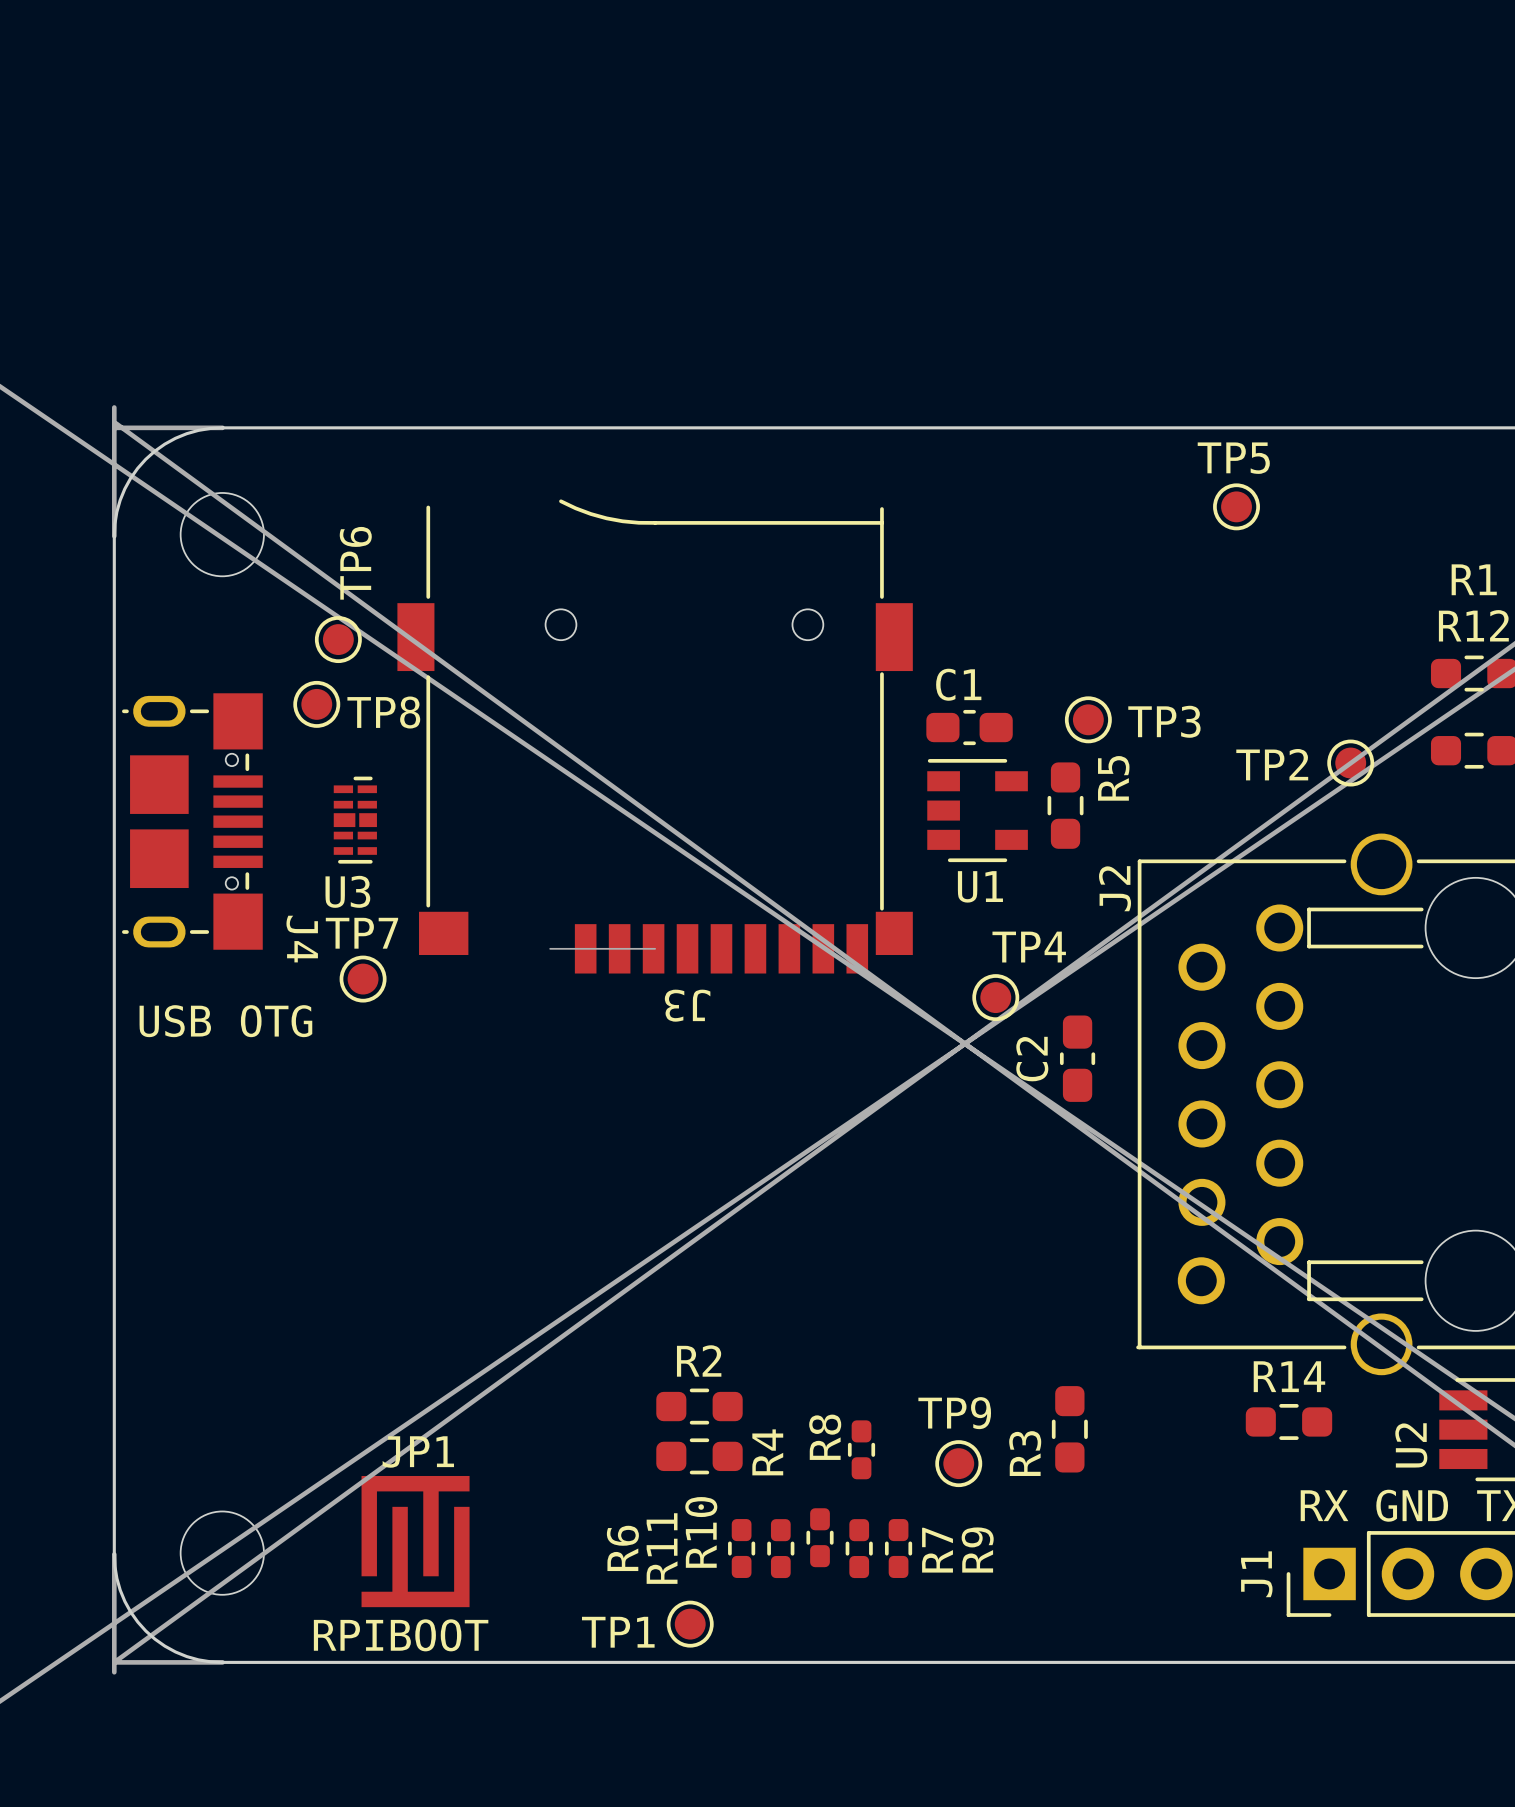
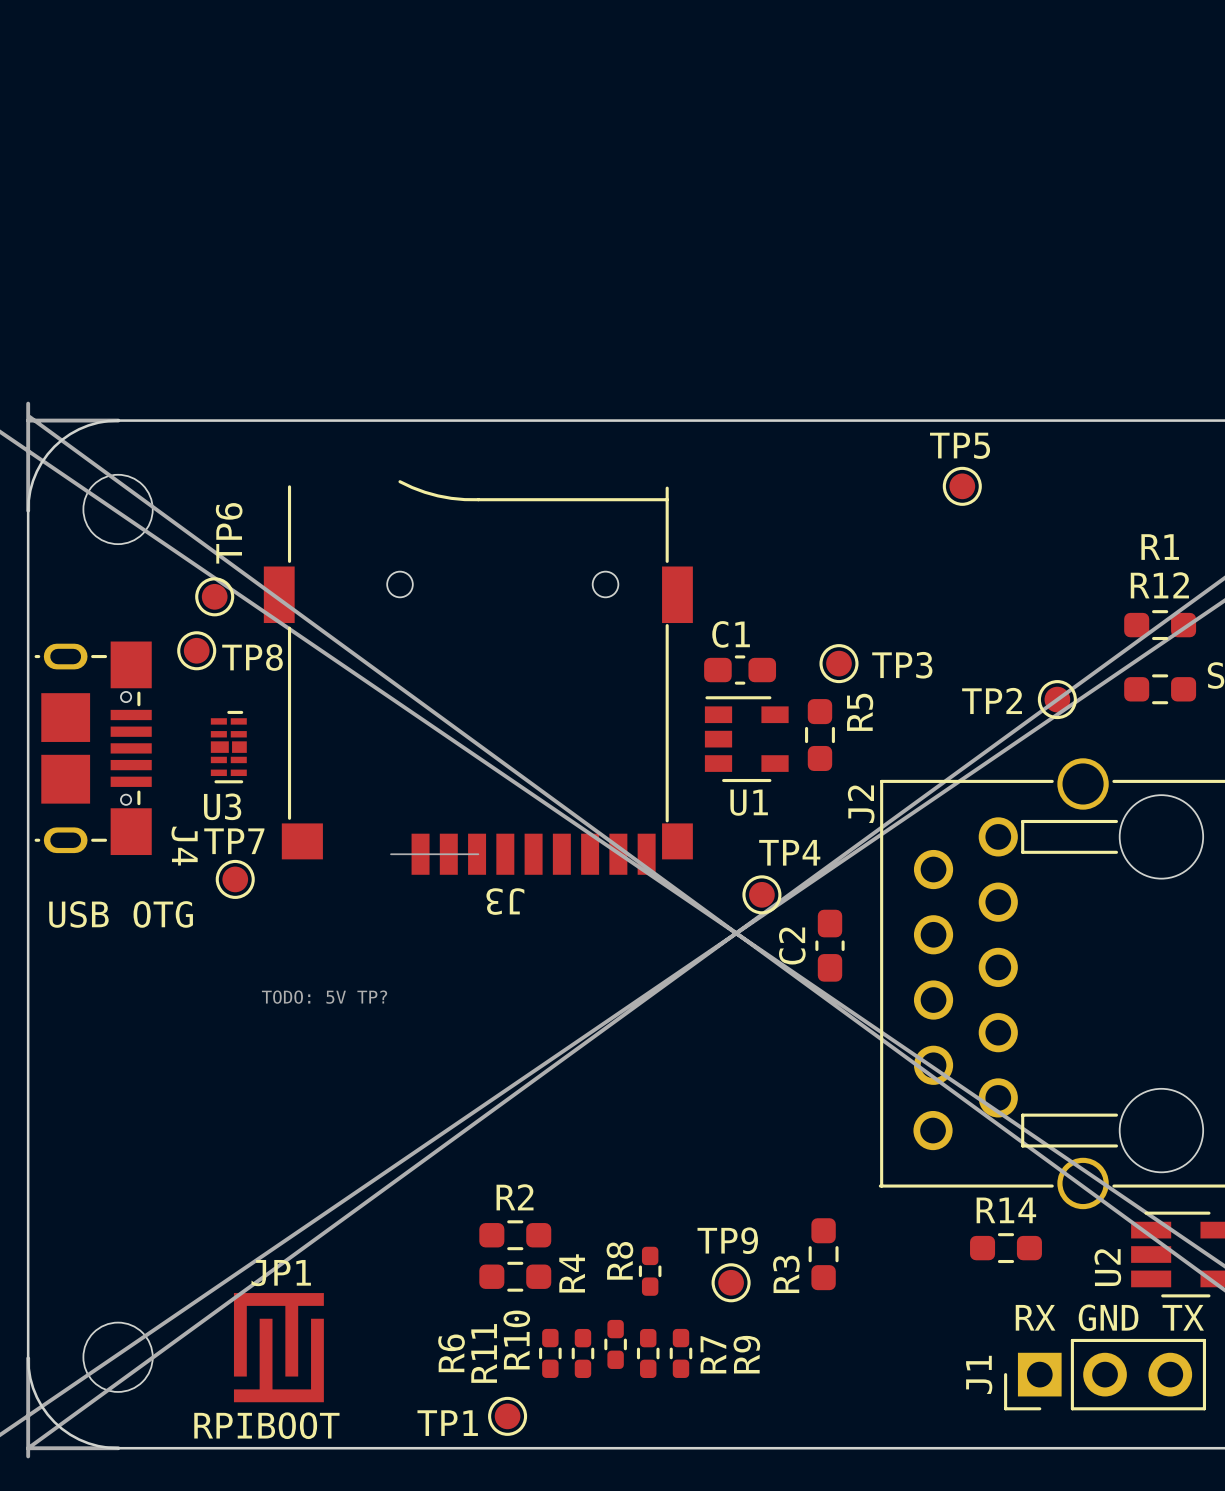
text: none -> TODO: 5V TP? (324, 997)

